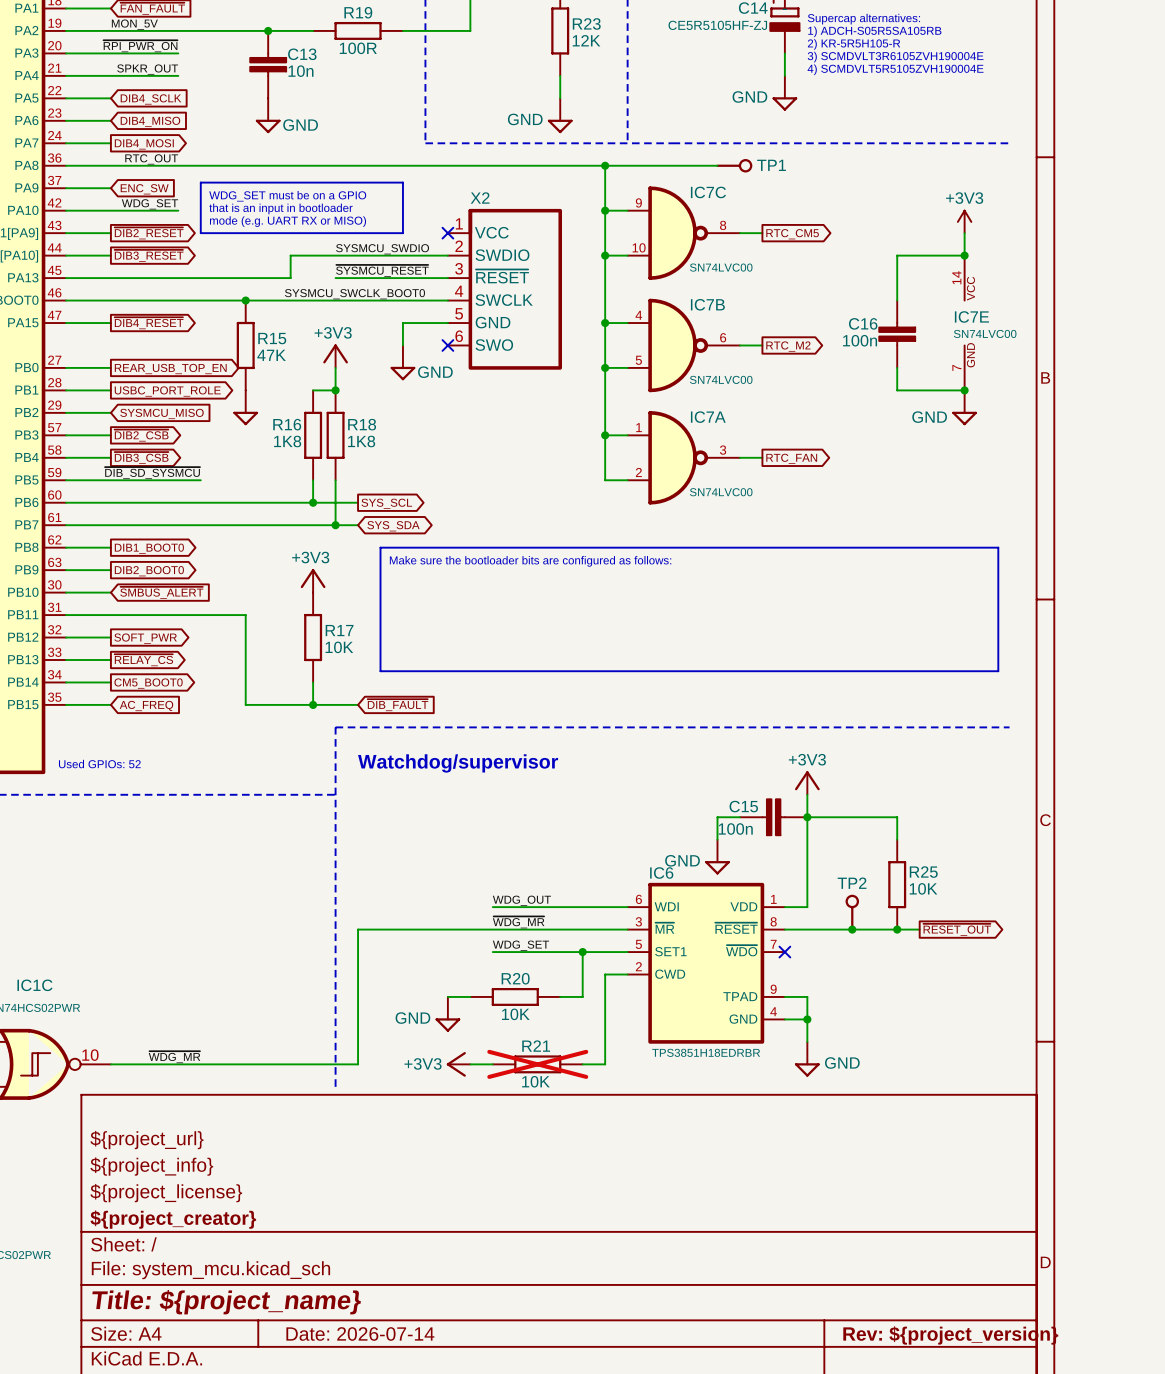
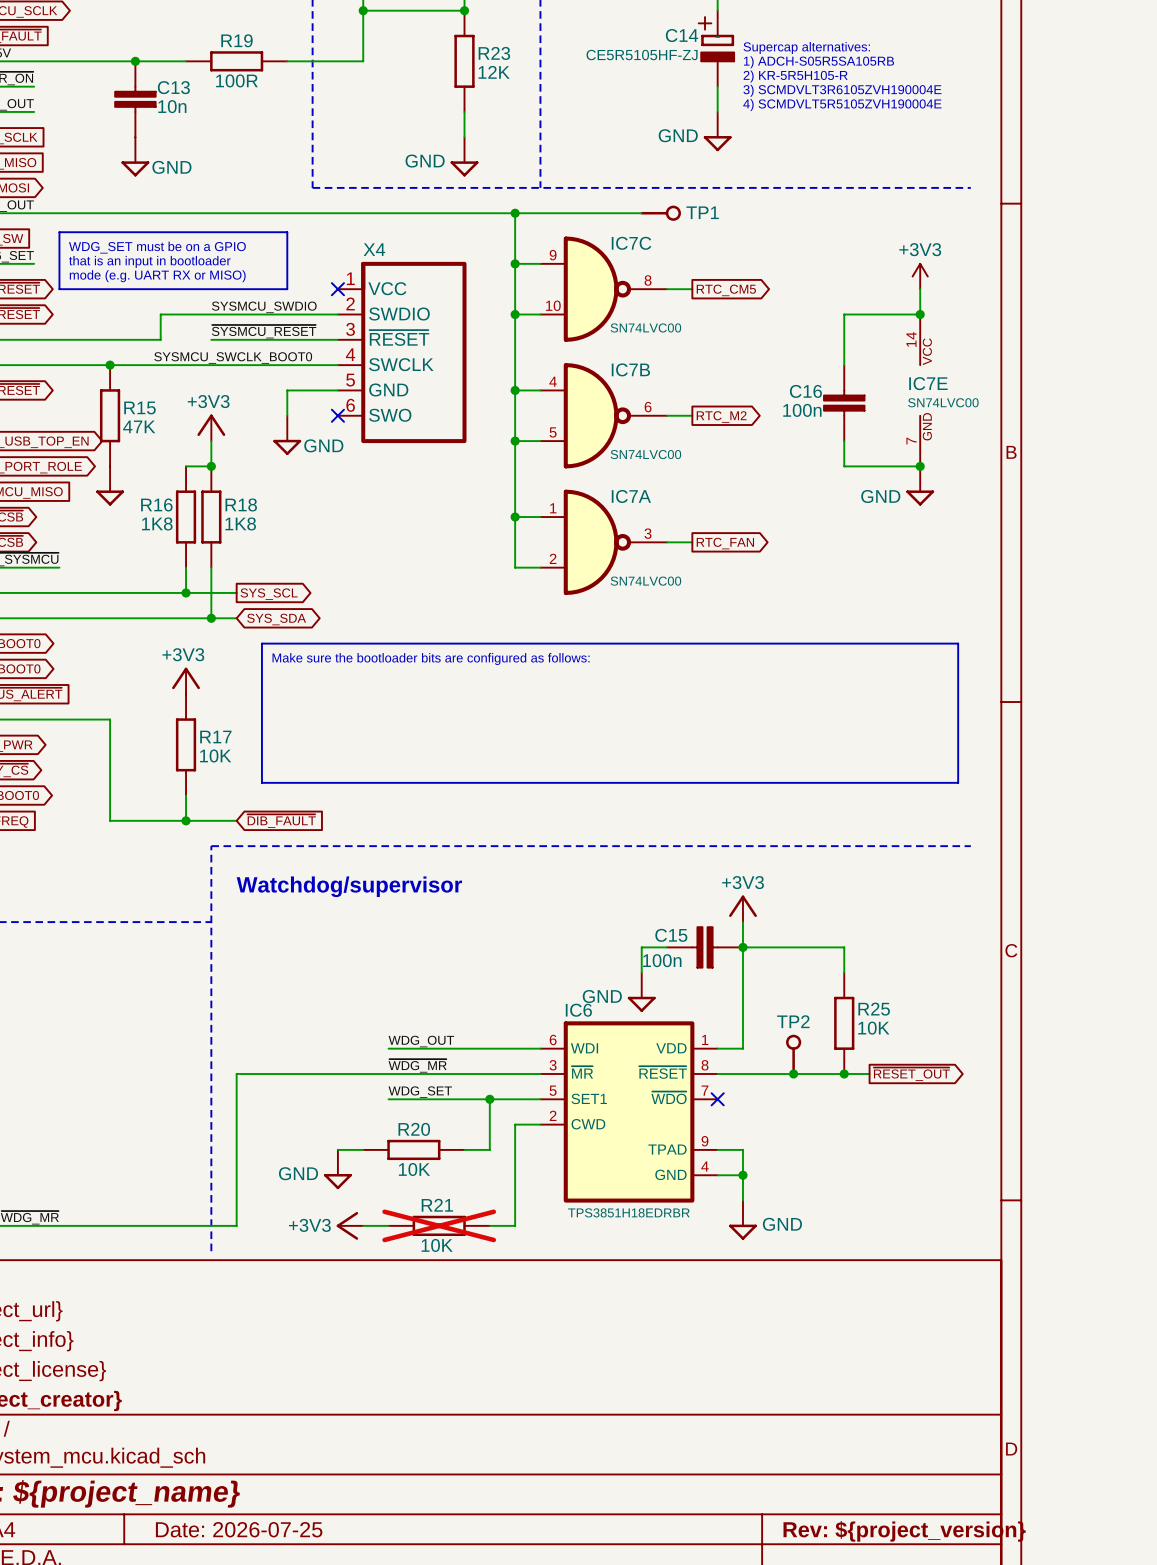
X2 name: X2 (480, 197) -> X4 (374, 249)
title block: Date: 2026-07-14 (360, 1333) -> Date: 2026-07-25 (239, 1529)

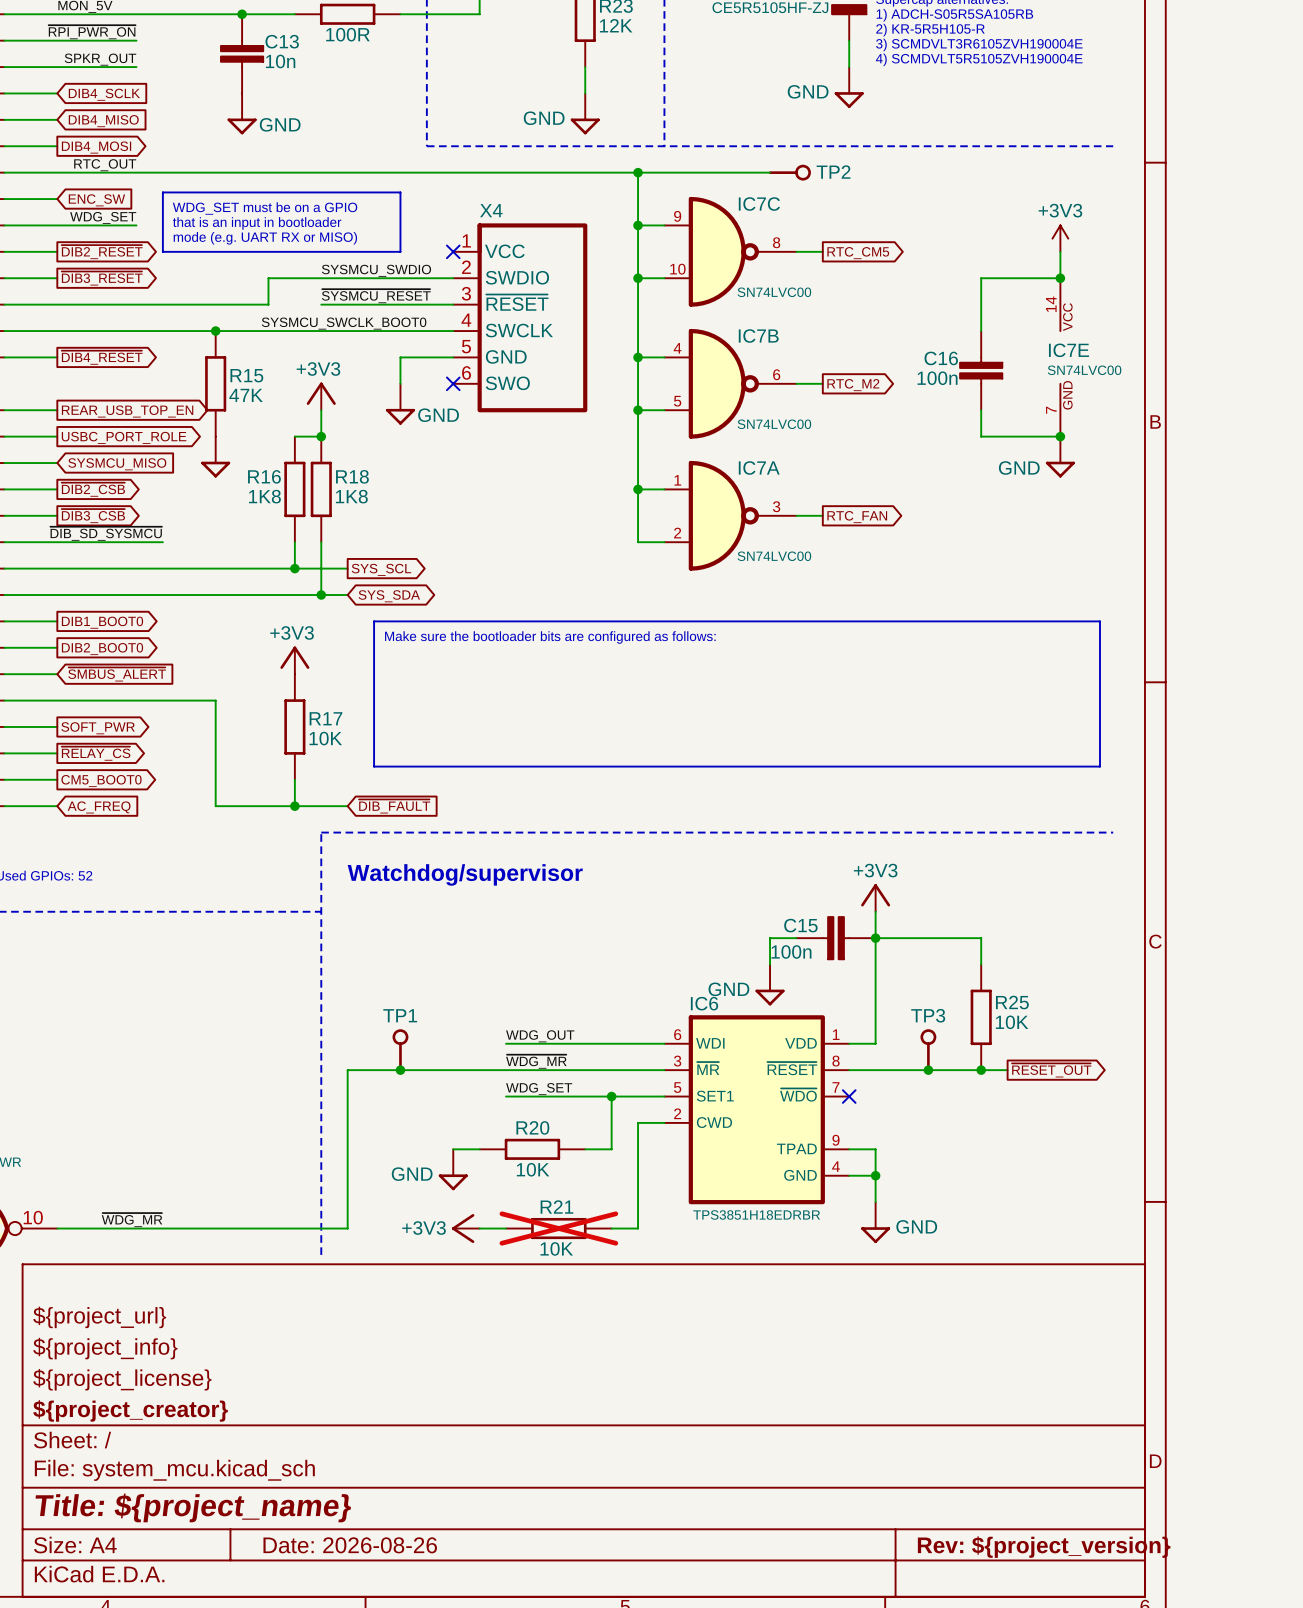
TP1 name: TP1 (702, 212) -> TP2 (833, 172)
TP2 name: TP2 (793, 1021) -> TP3 (928, 1015)
TP1: none -> (400, 1050)
junction: none -> (400, 1070)
title block: Date: 2026-07-25 (239, 1529) -> Date: 2026-08-26 (350, 1545)

